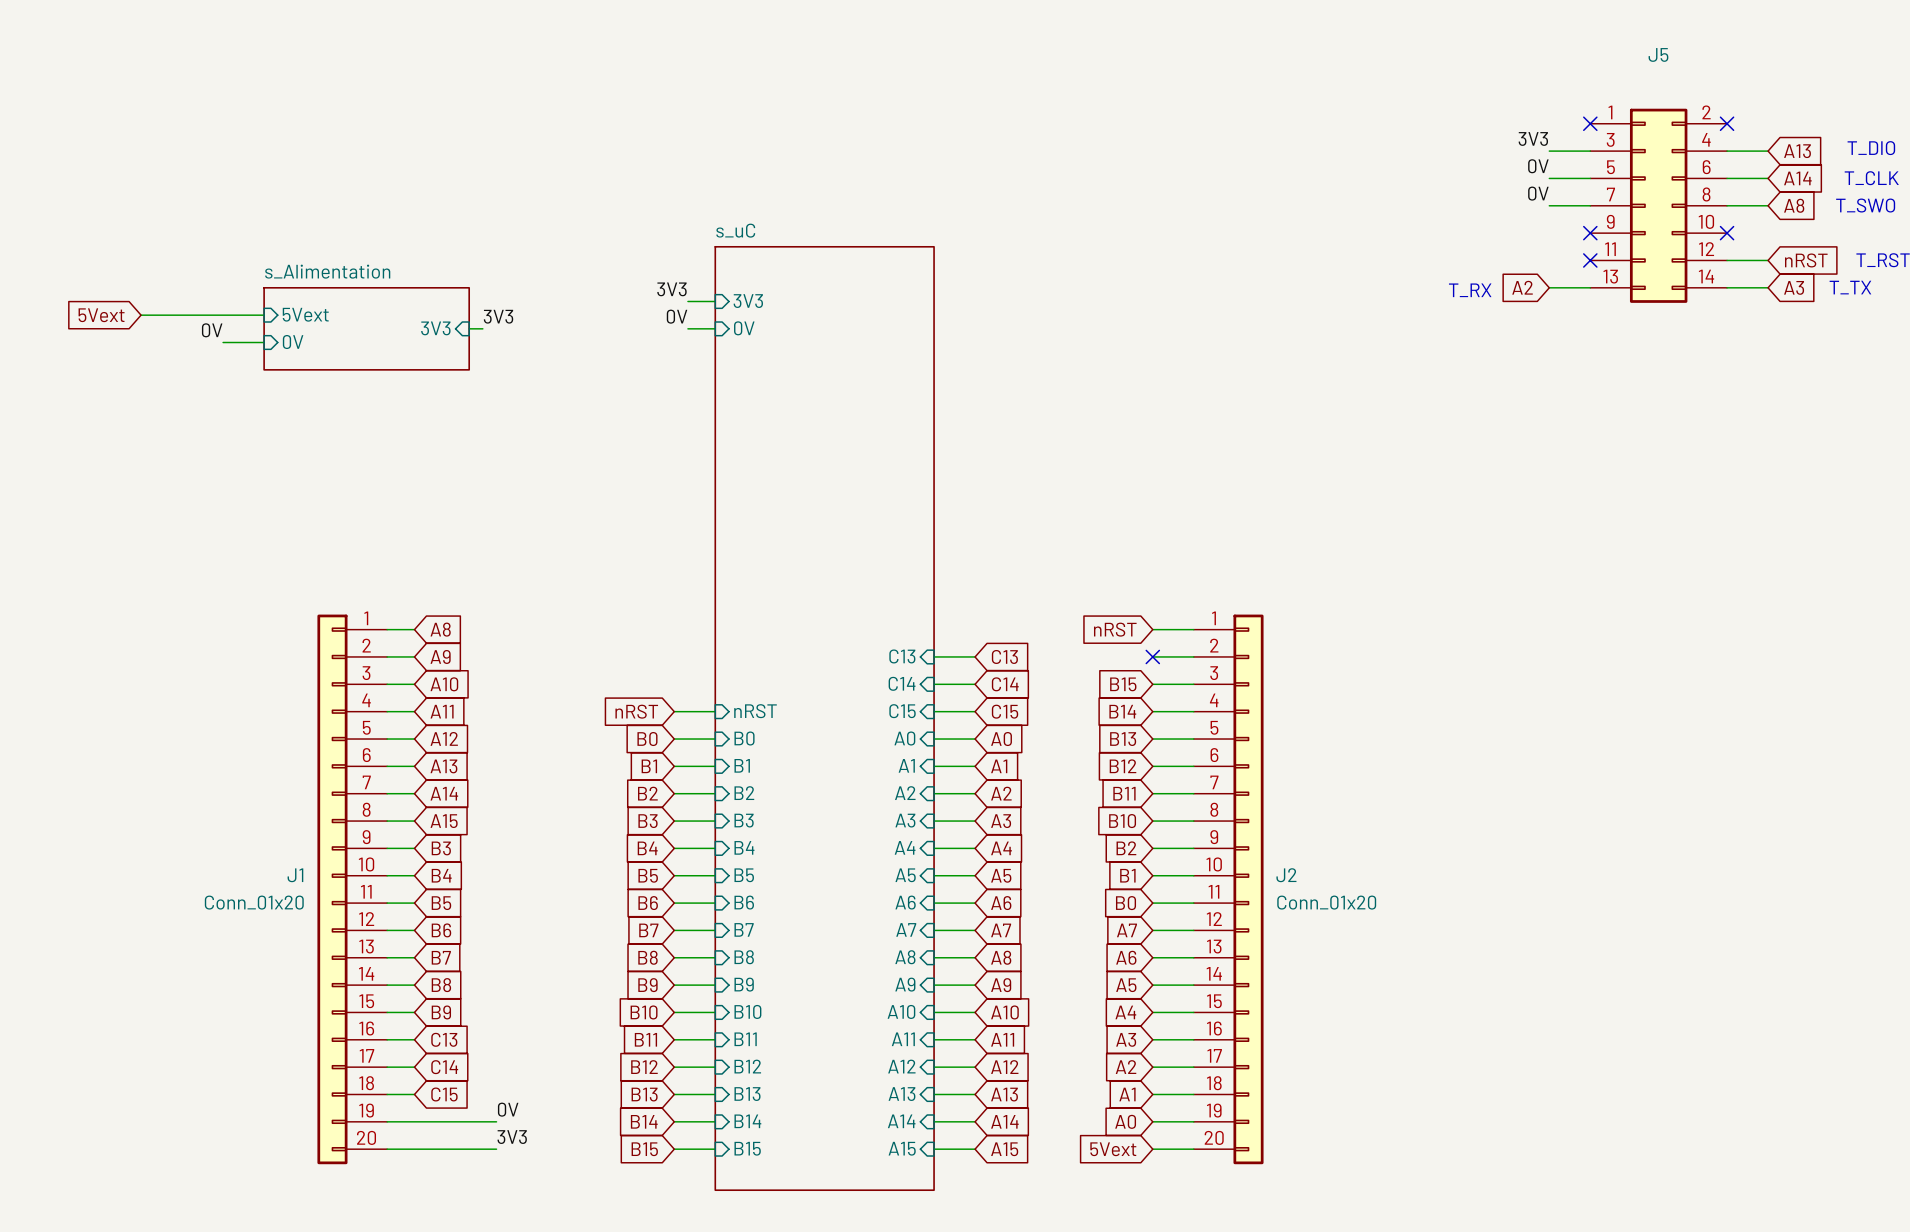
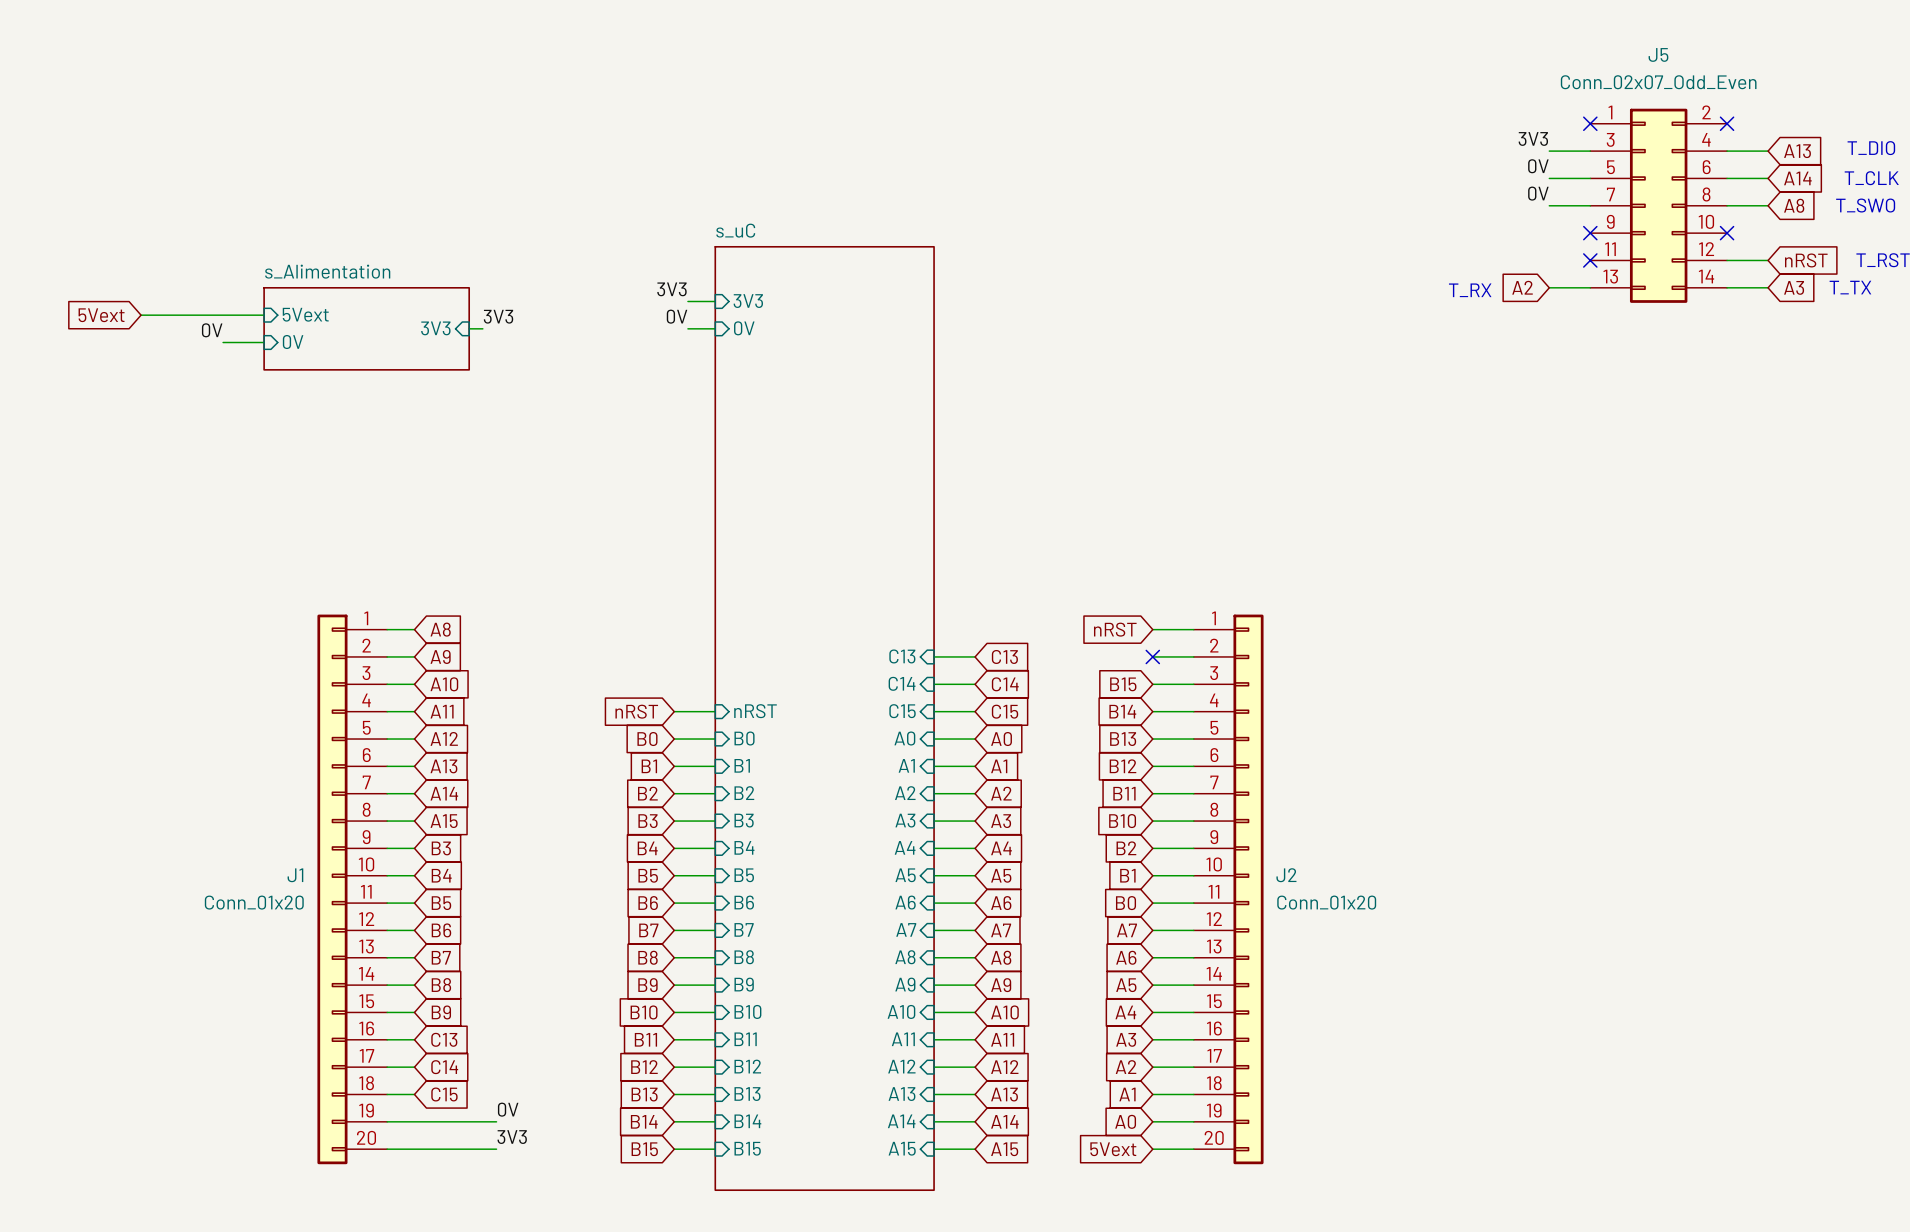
J5 value: none -> Conn_02x07_Odd_Even (1658, 82)

